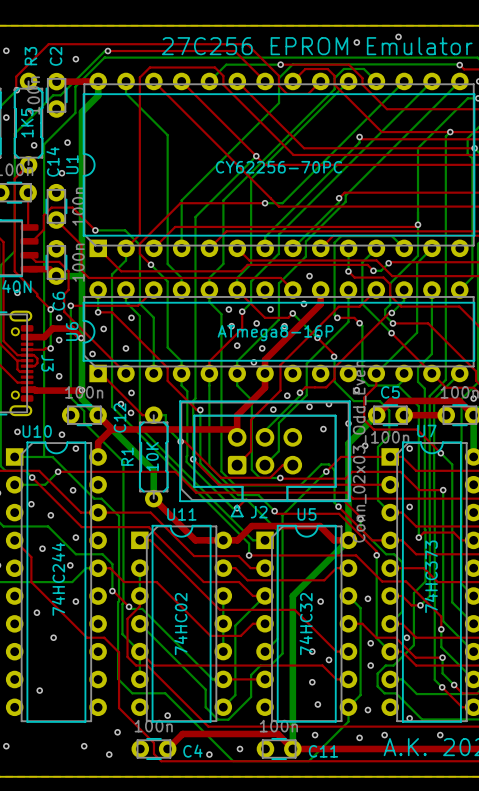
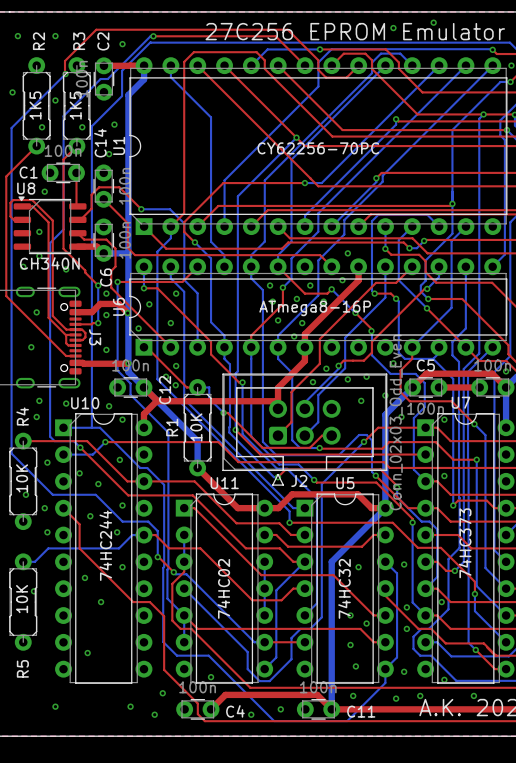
top track: (348, 623) (362, 623) (376, 637) (395, 637) (415, 657) (442, 657) -> (385, 588) (385, 595) (418, 628) (431, 628) (445, 643) (483, 643) (496, 655)
bottom track: (442, 657) (442, 673) (454, 685) -> none
via: (442, 657) -> none
via: (454, 685) -> none

